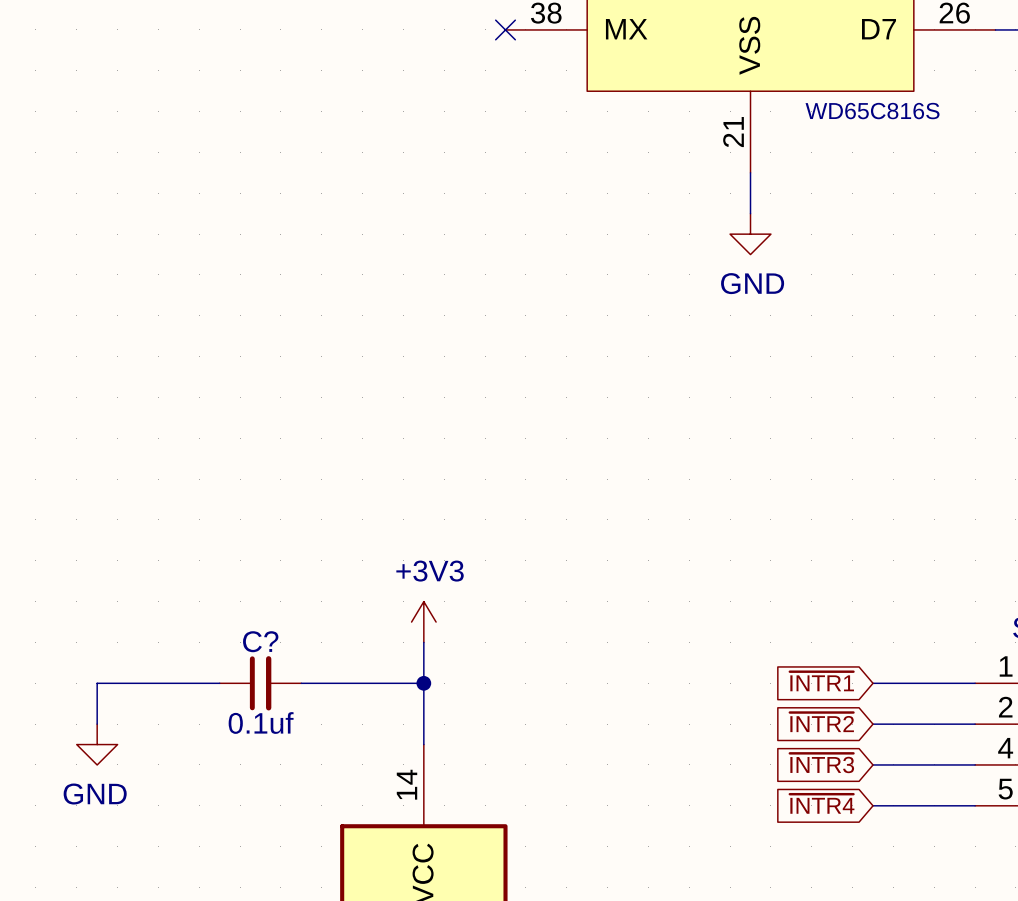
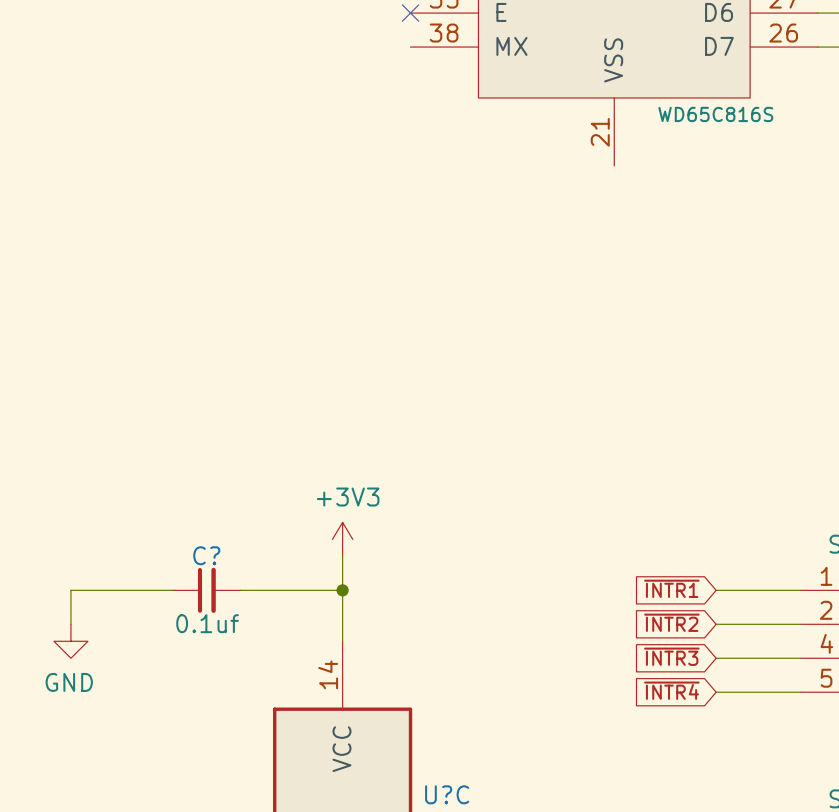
no-connect mark: (505, 29) -> none
wire: (750, 172) (750, 213) -> none
power symbol: GND (750, 234) -> none

